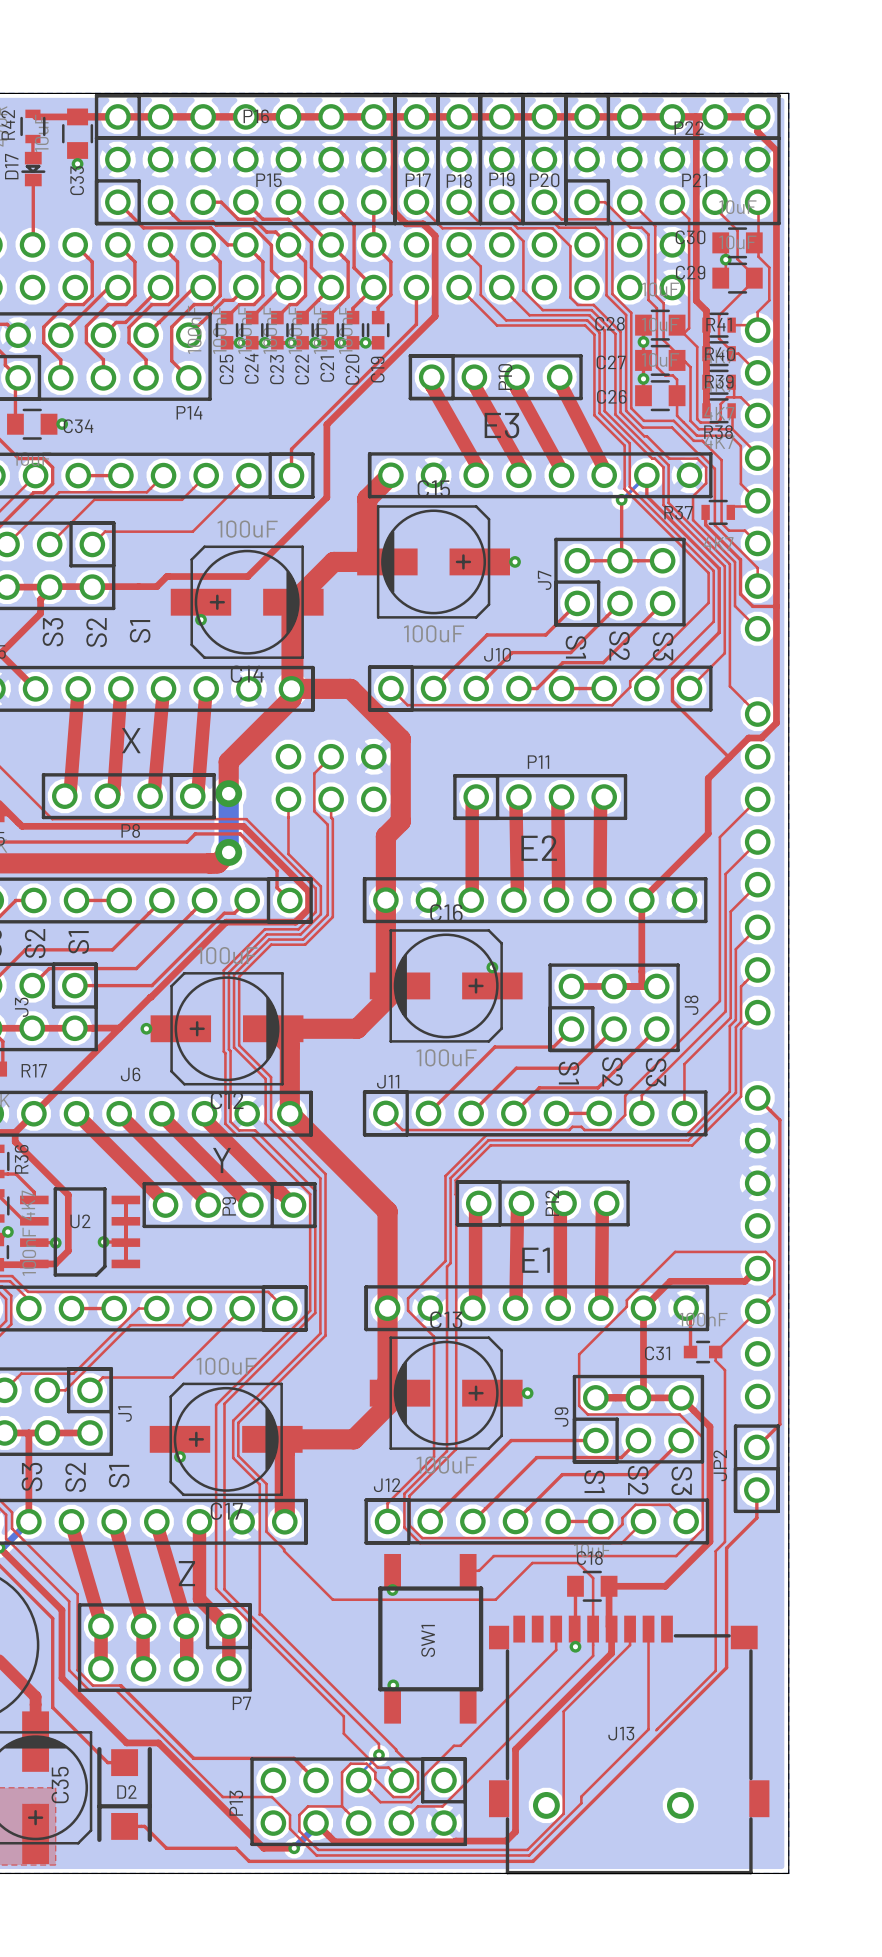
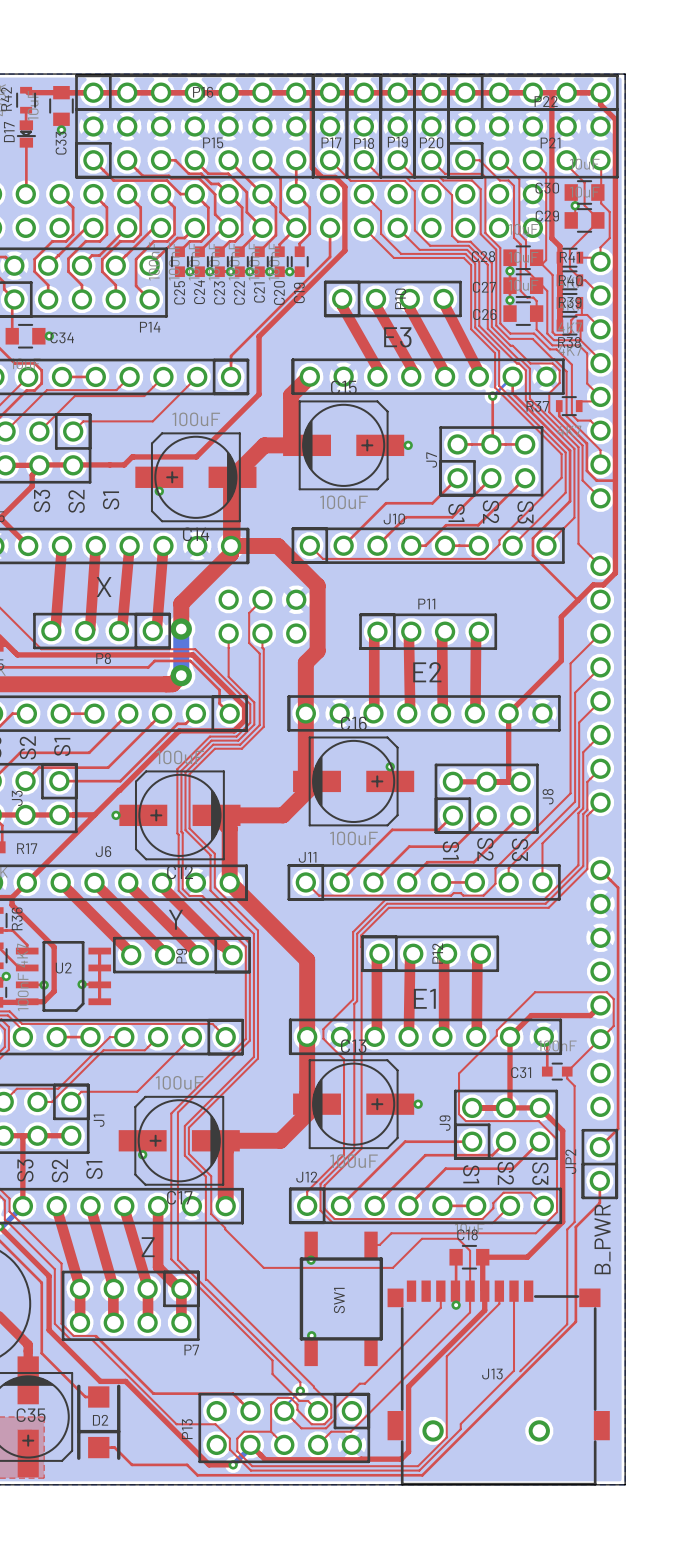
text: none -> B_PWR (602, 1239)
C35 name rotation: 0° (60, 1785) -> 90° clockwise (31, 1415)

